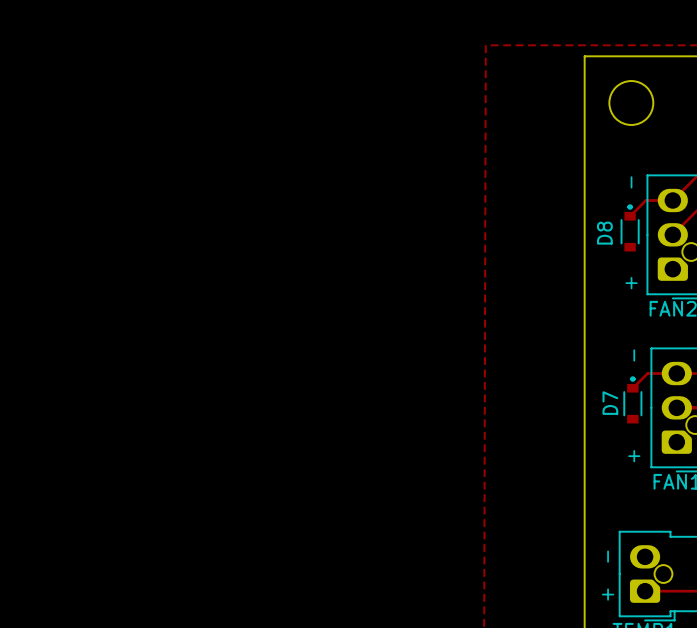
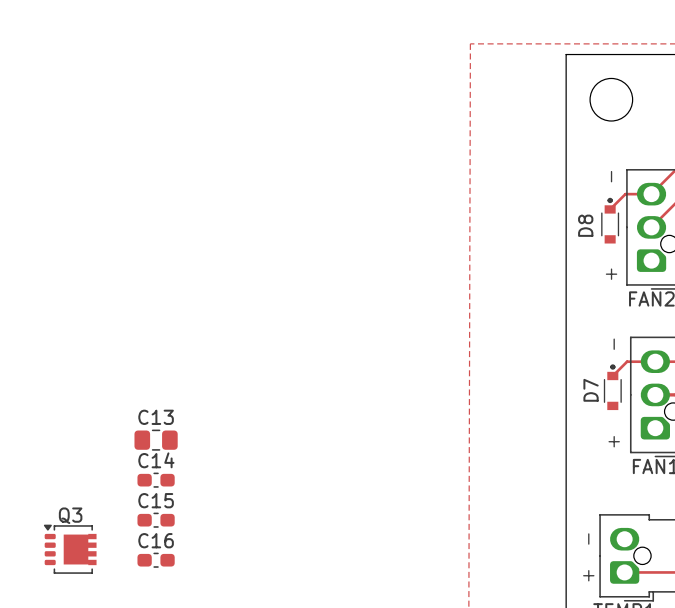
C13: none -> (156, 440)
C14: none -> (156, 480)
C15: none -> (156, 520)
Q3: none -> (70, 549)
C16: none -> (156, 560)

